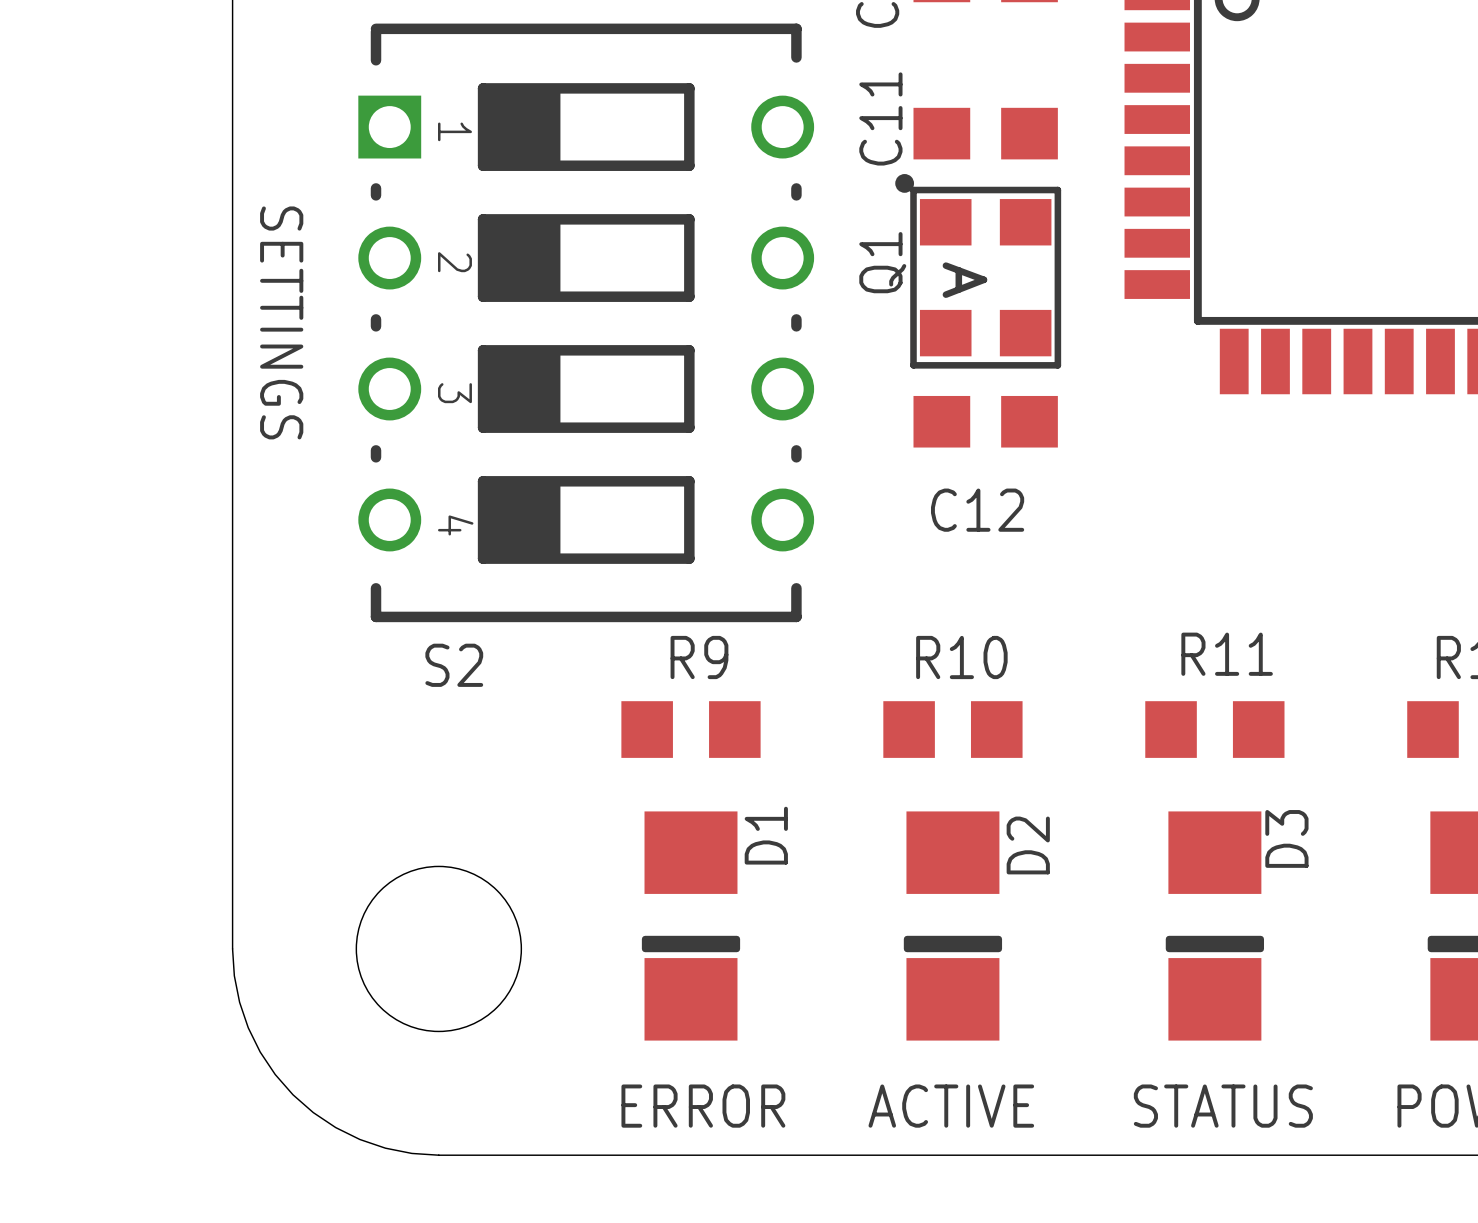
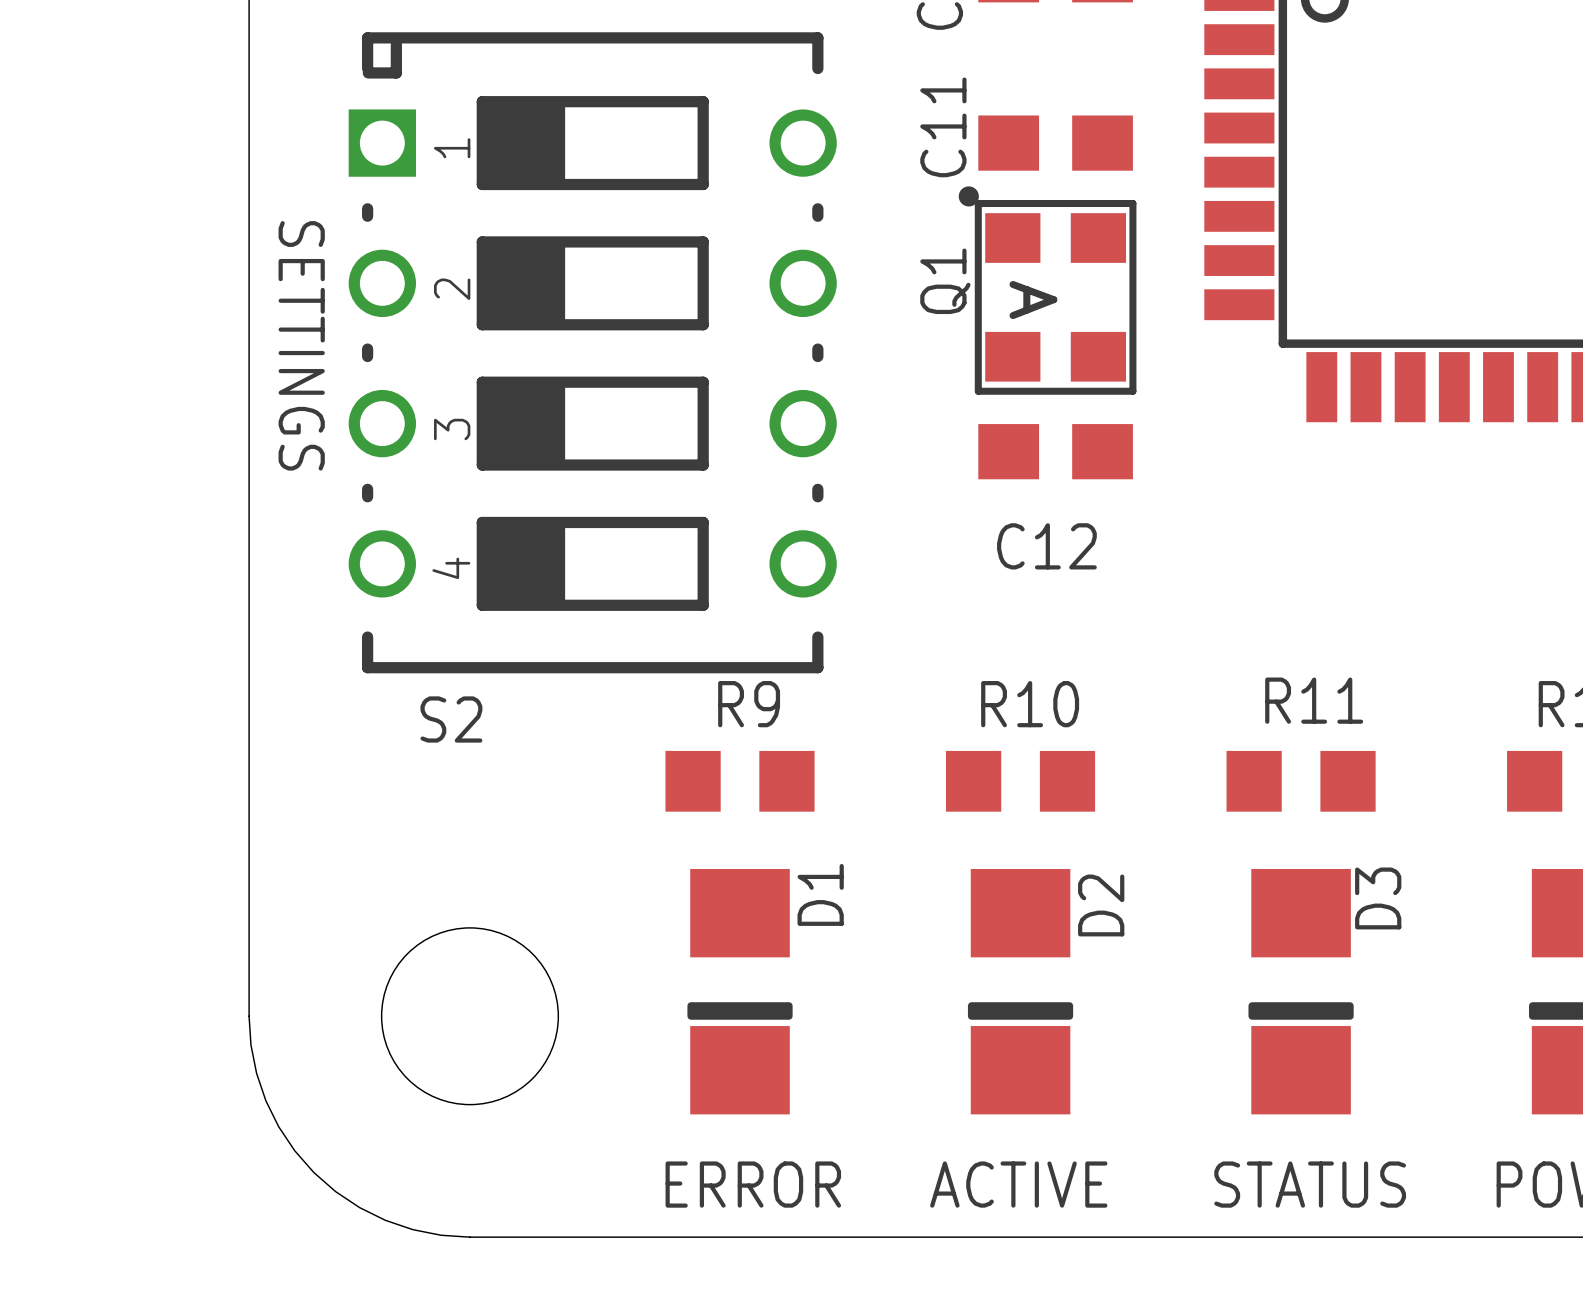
S2 footprint: [358, 23, 815, 623] -> [348, 32, 837, 674]

